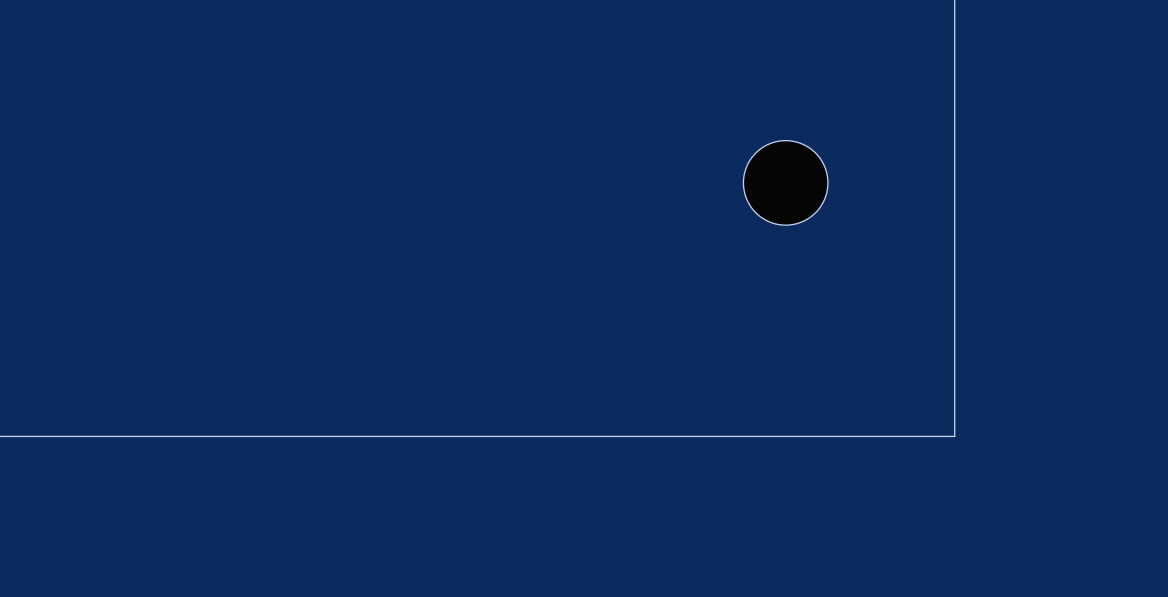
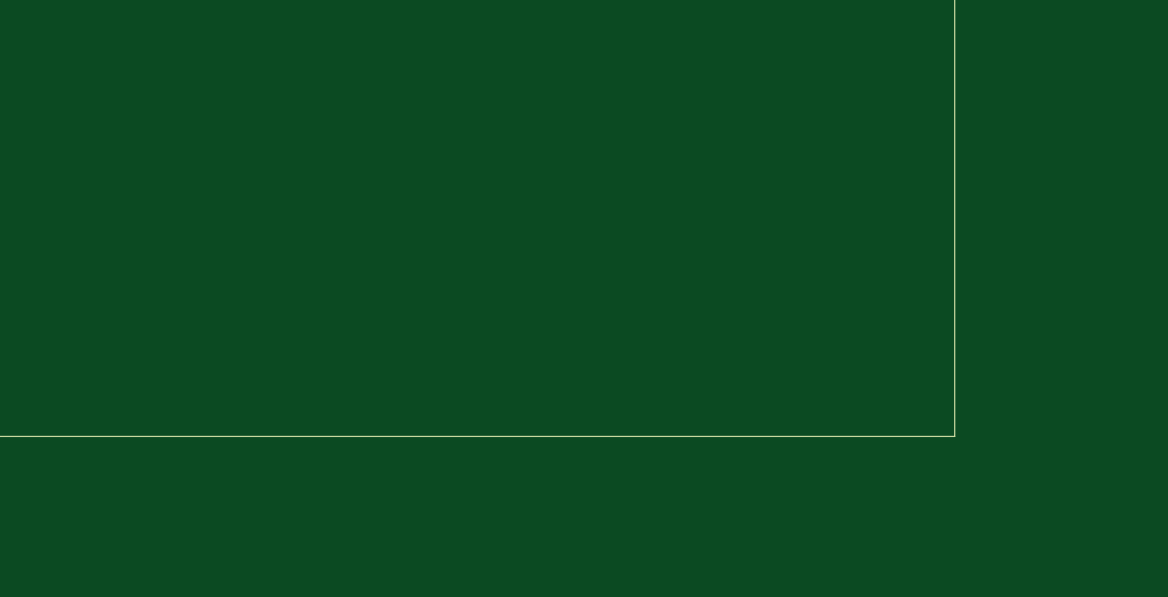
hole: (785, 182) -> none

